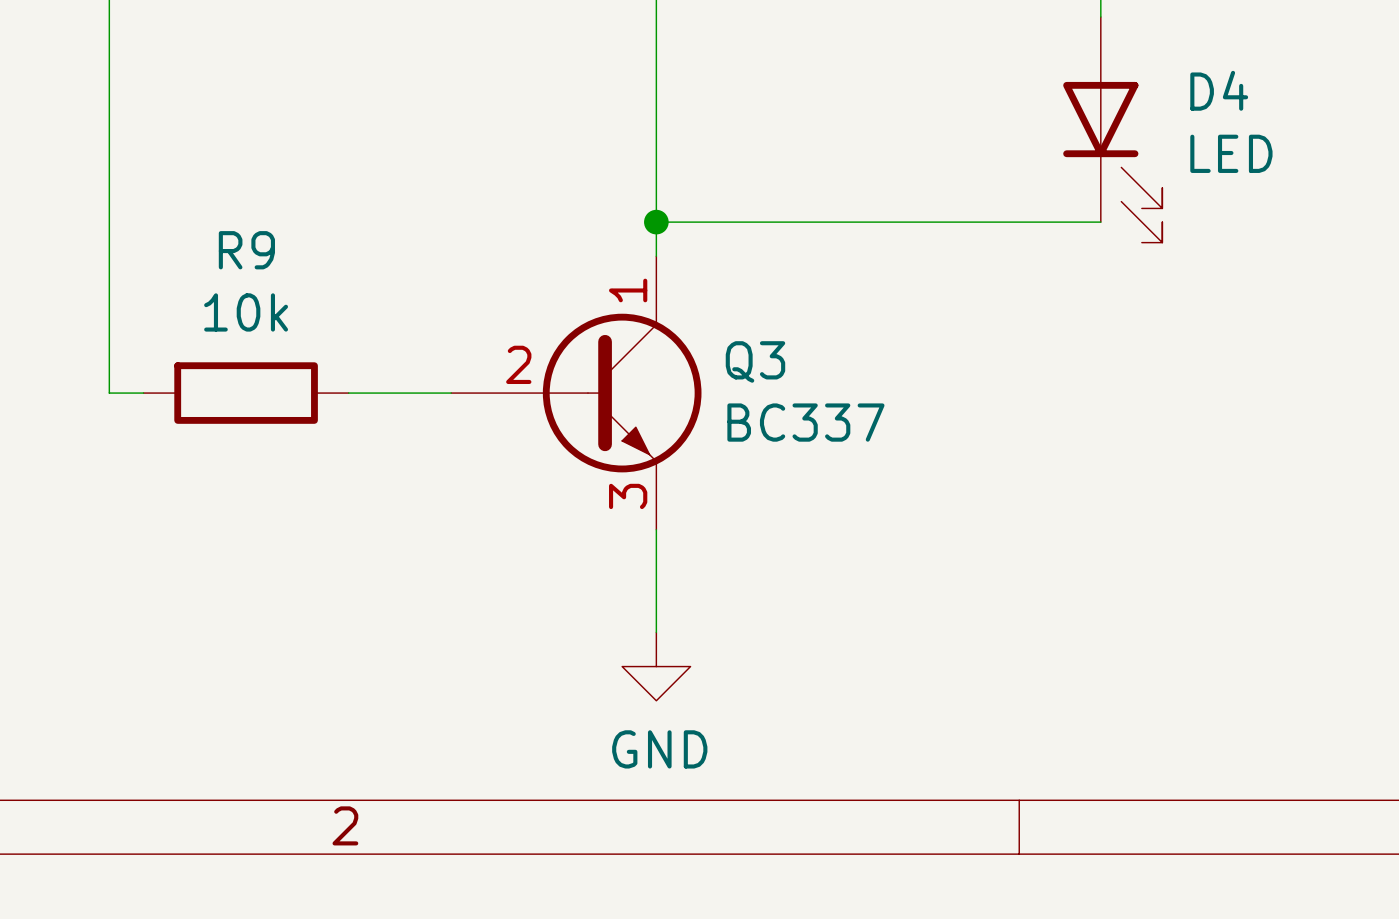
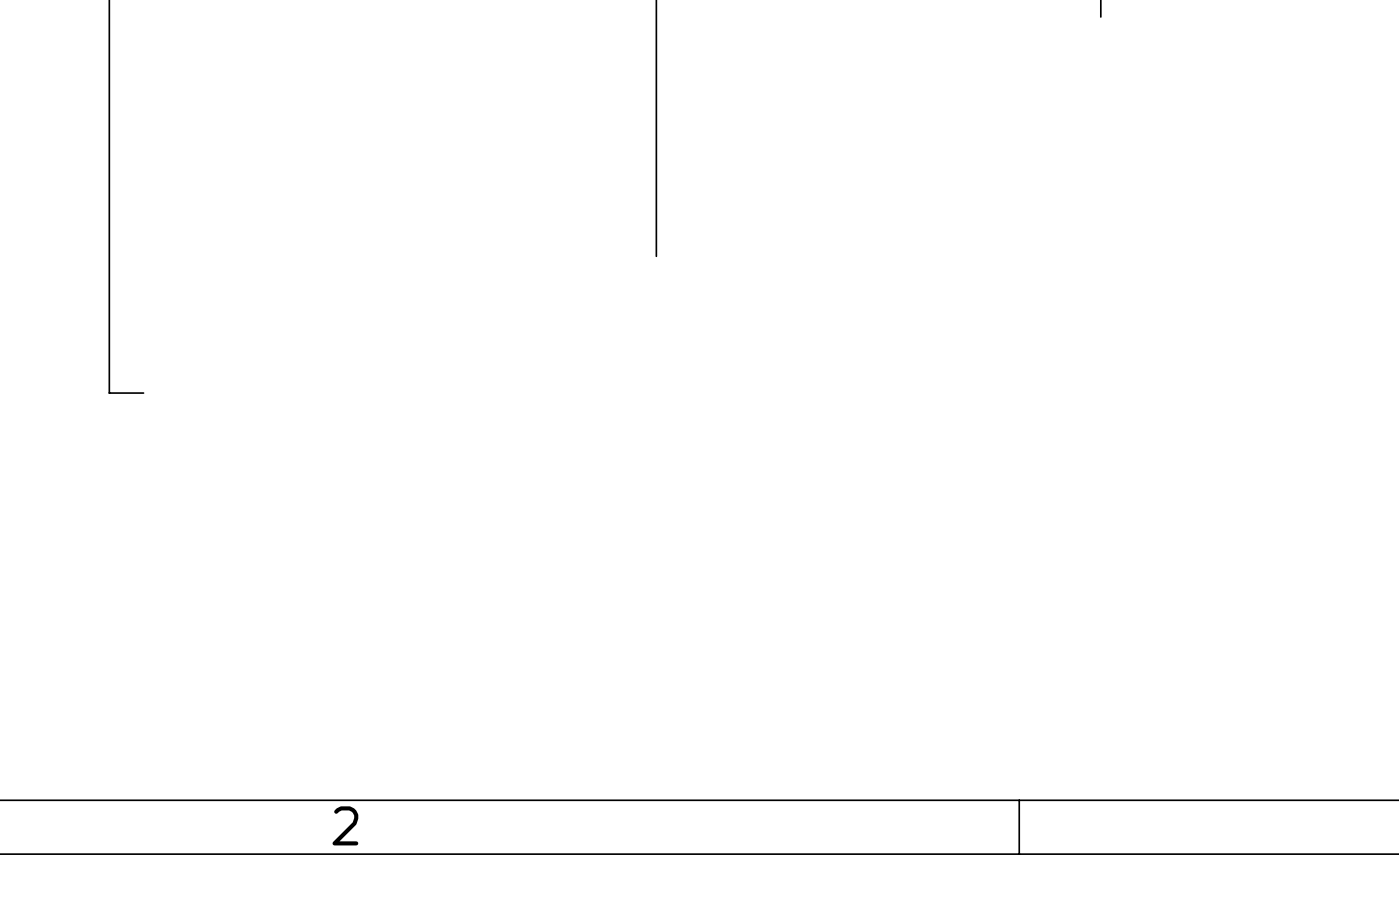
D4: LED (1112, 129) -> none
wire: (656, 222) (1100, 222) -> none
junction: (656, 222) -> none
R9: 10k (246, 393) -> none
wire: (348, 393) (451, 393) -> none
Q3: BC337 (576, 393) -> none
wire: (656, 529) (656, 632) -> none
power symbol: GND (656, 666) -> none

